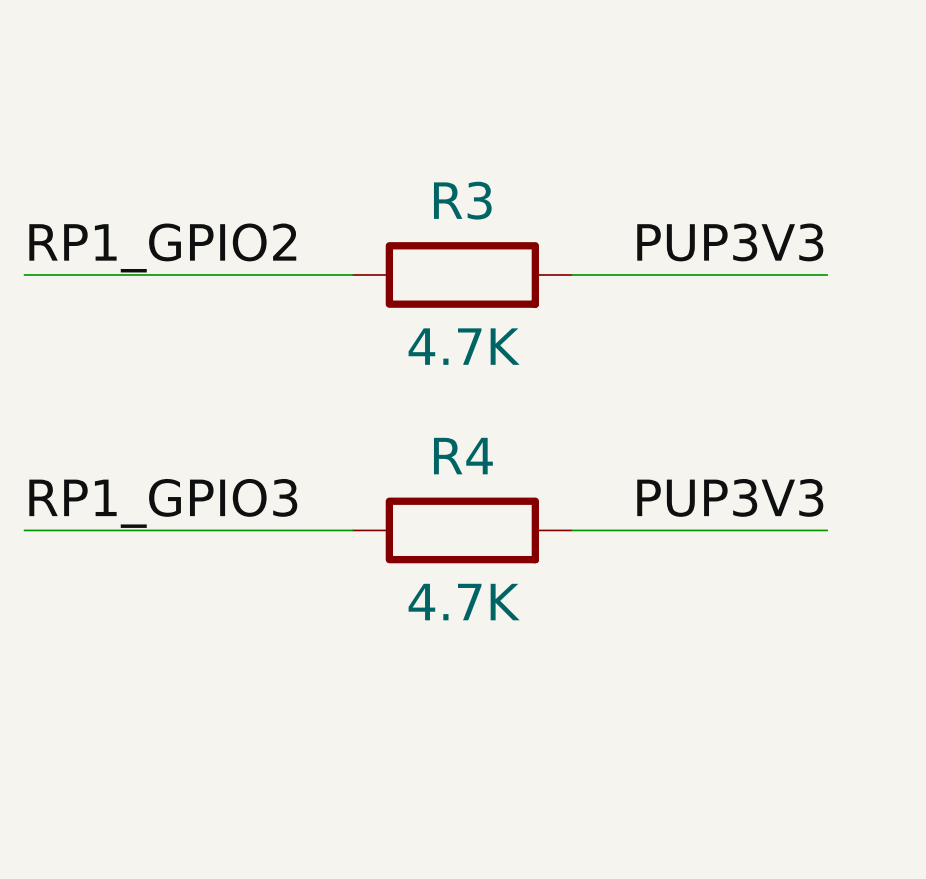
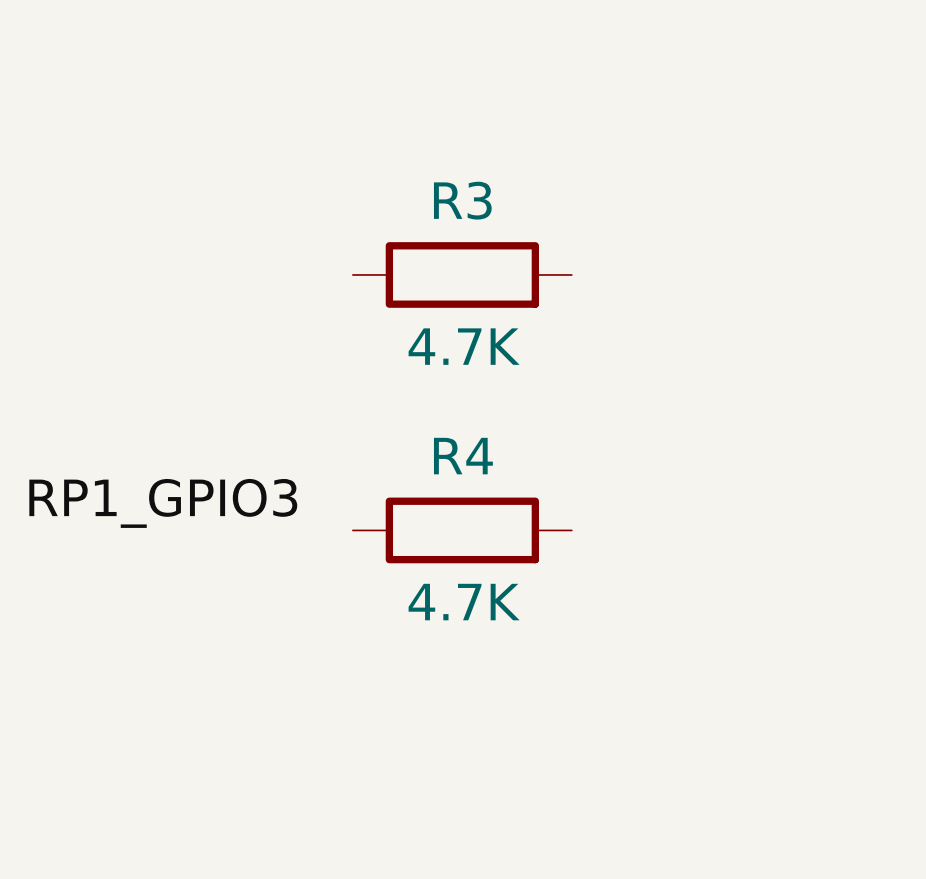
label: PUP3V3 (730, 242) -> none
label: RP1_GPIO2 (162, 247) -> none
wire: (24, 274) (352, 274) -> none
wire: (571, 274) (827, 274) -> none
label: PUP3V3 (730, 497) -> none
wire: (24, 530) (352, 530) -> none
wire: (571, 530) (827, 530) -> none

